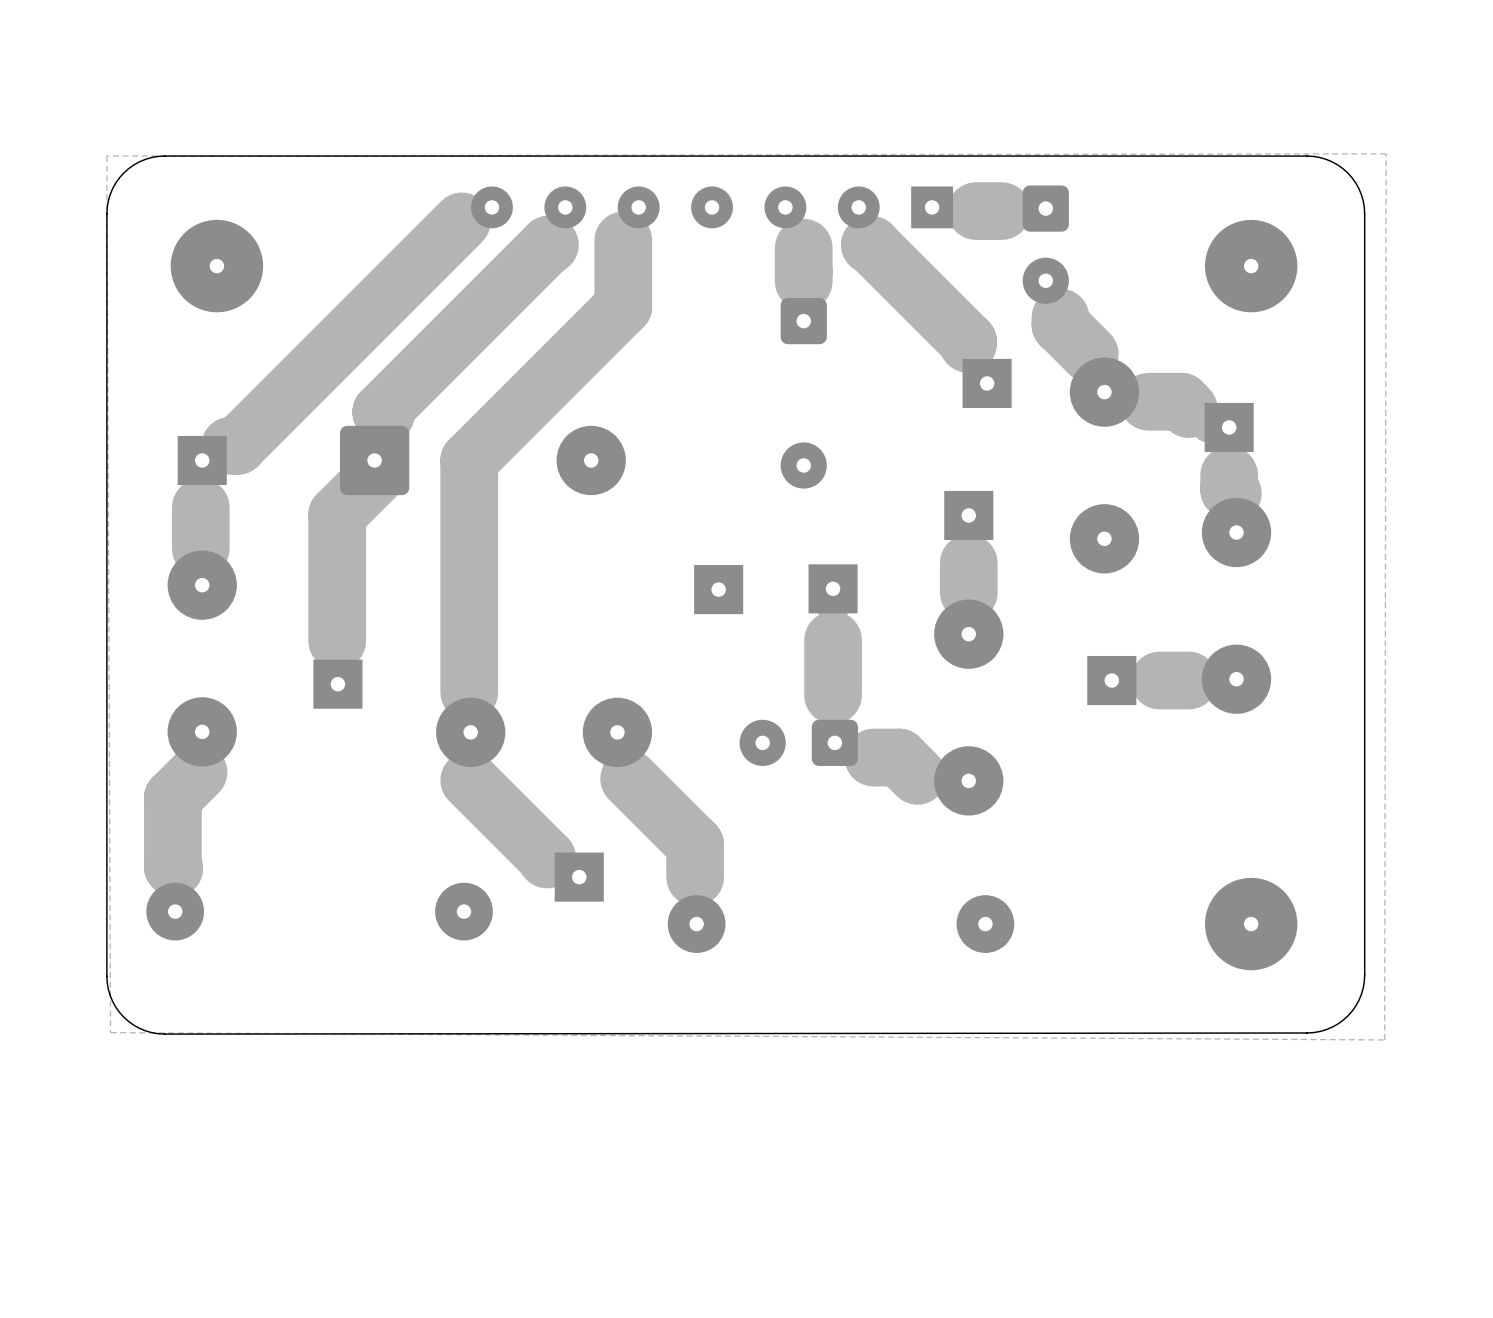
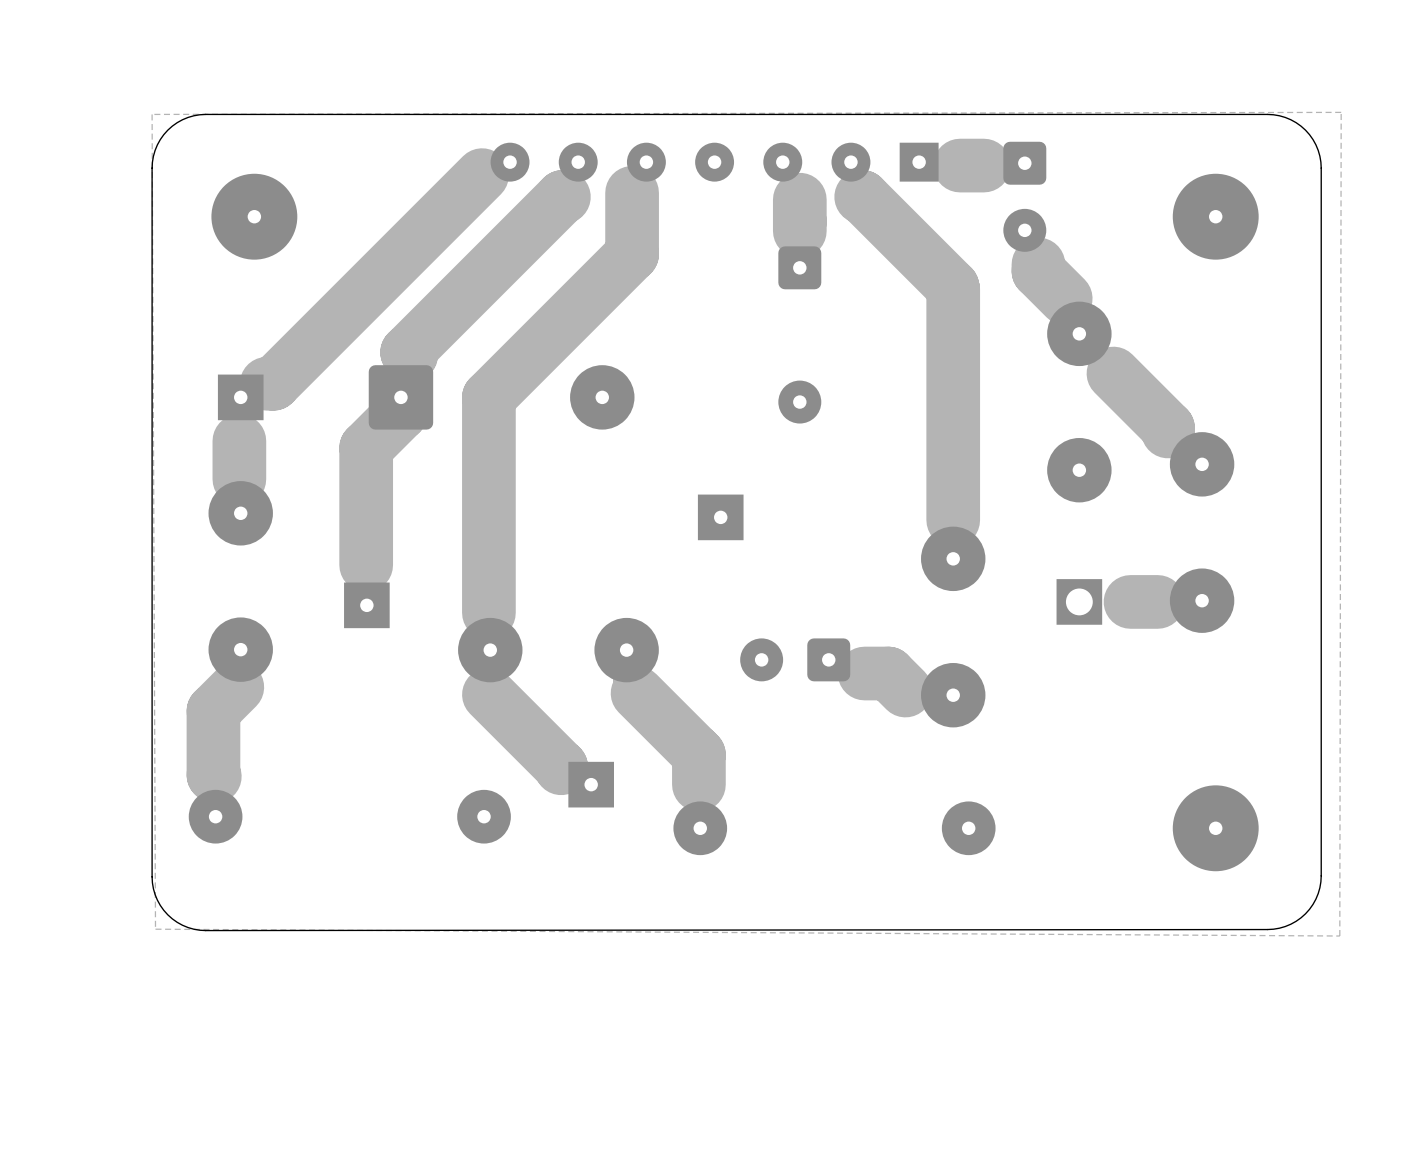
track: none -> (952, 288) (953, 492)
part: (987, 383) -> none
track: (1148, 401) (1181, 401) (1207, 427) (1229, 427) -> none
part: (1229, 427) -> none
track: (1229, 475) (1229, 489) (1236, 497) (1236, 532) -> (1113, 373) (1202, 464)
part: (968, 515) -> none
track: (833, 588) (833, 695) -> none
part: (833, 588) -> none
part footprint: [1087, 655, 1137, 706] -> [1056, 579, 1103, 625]

